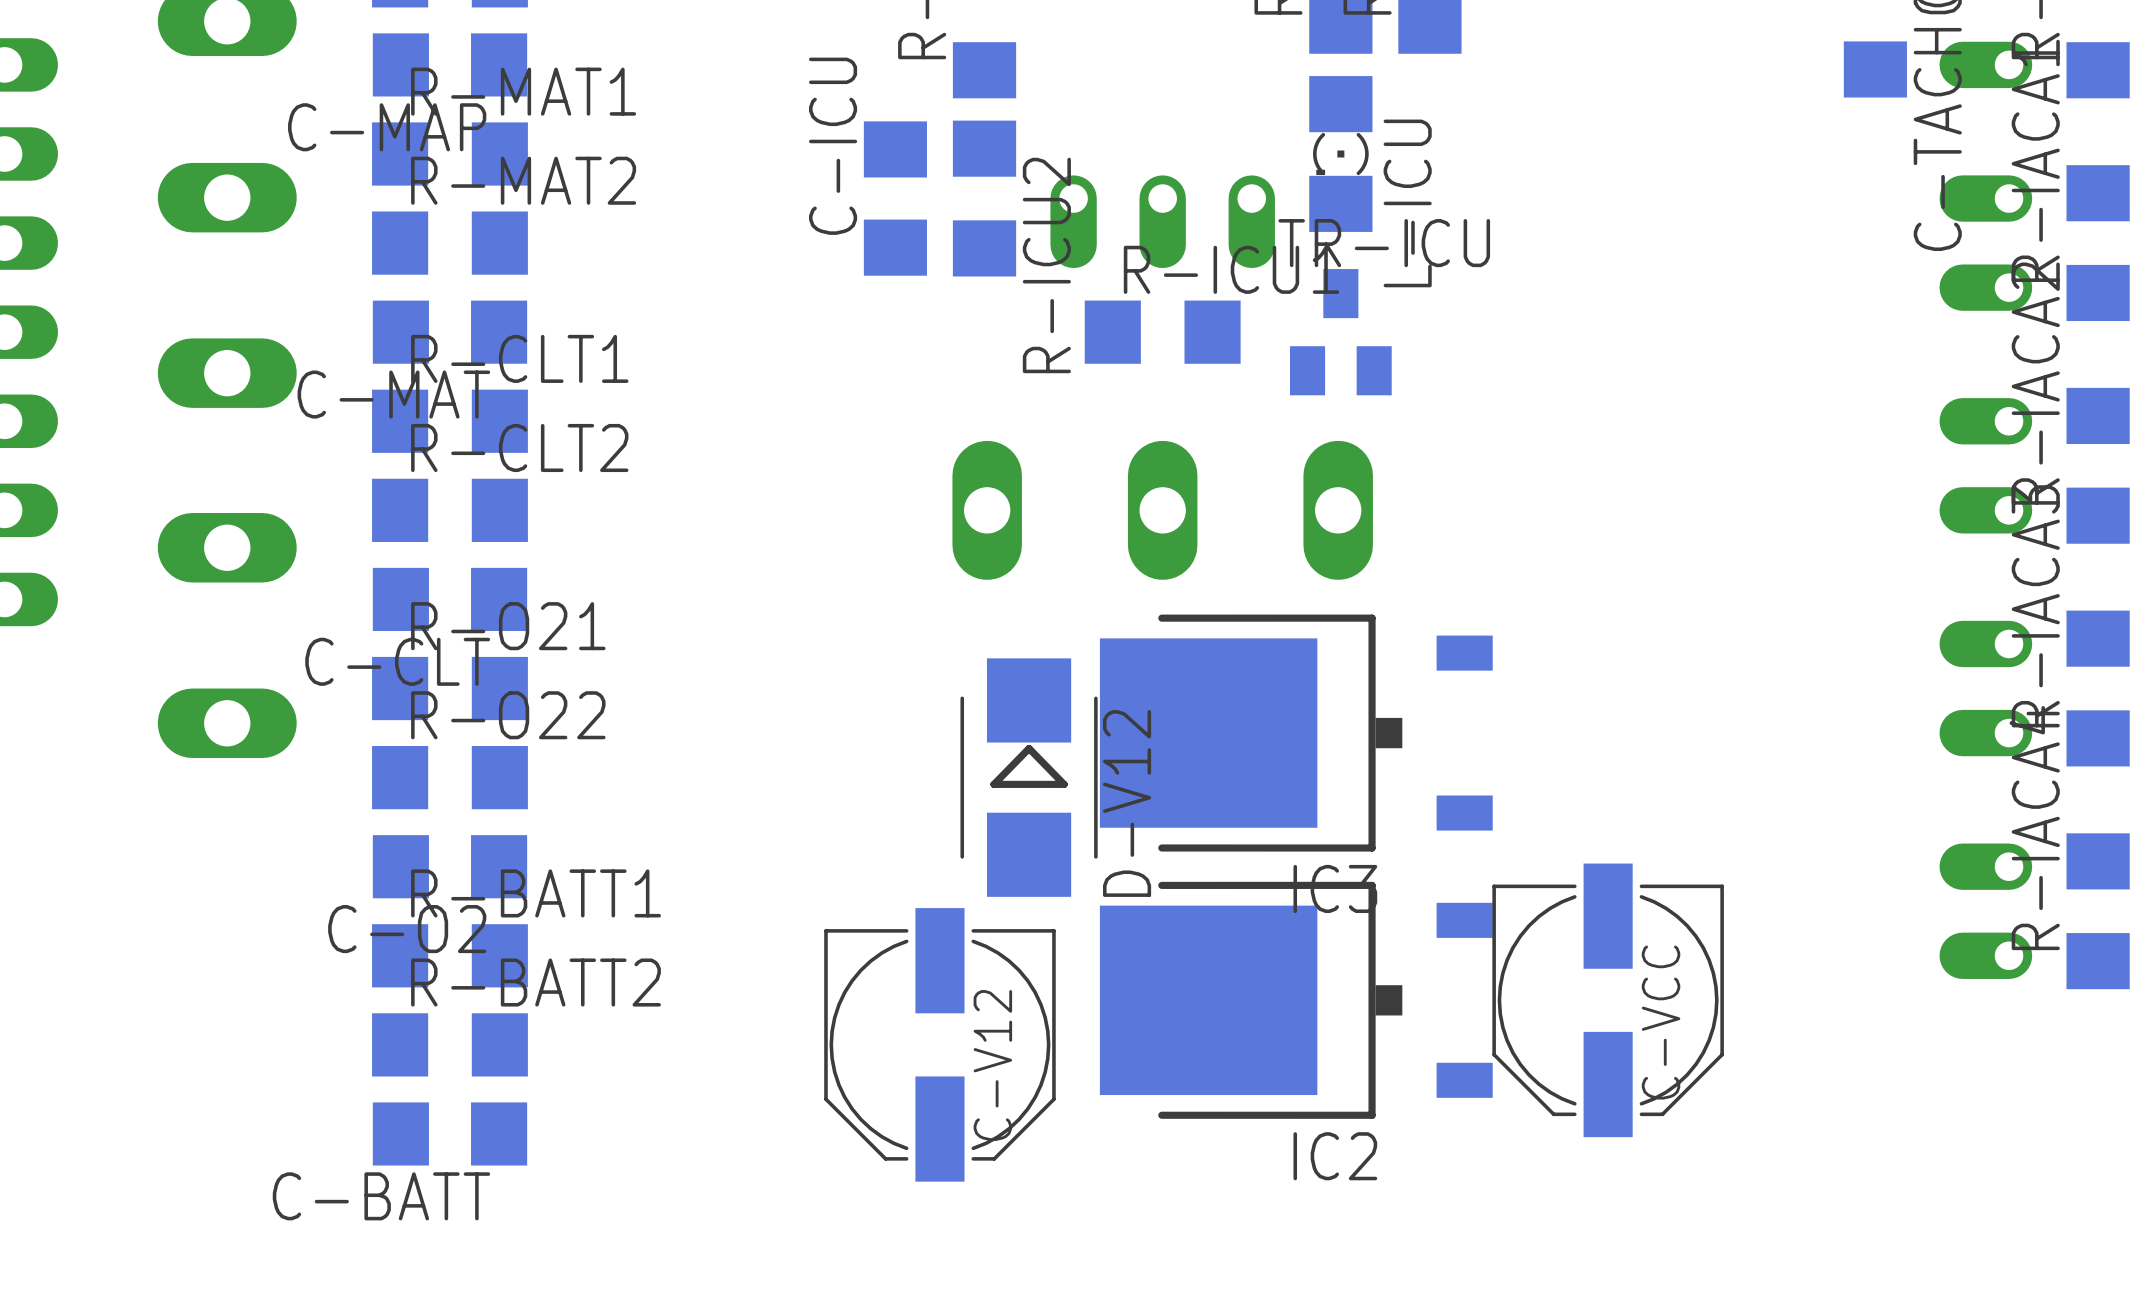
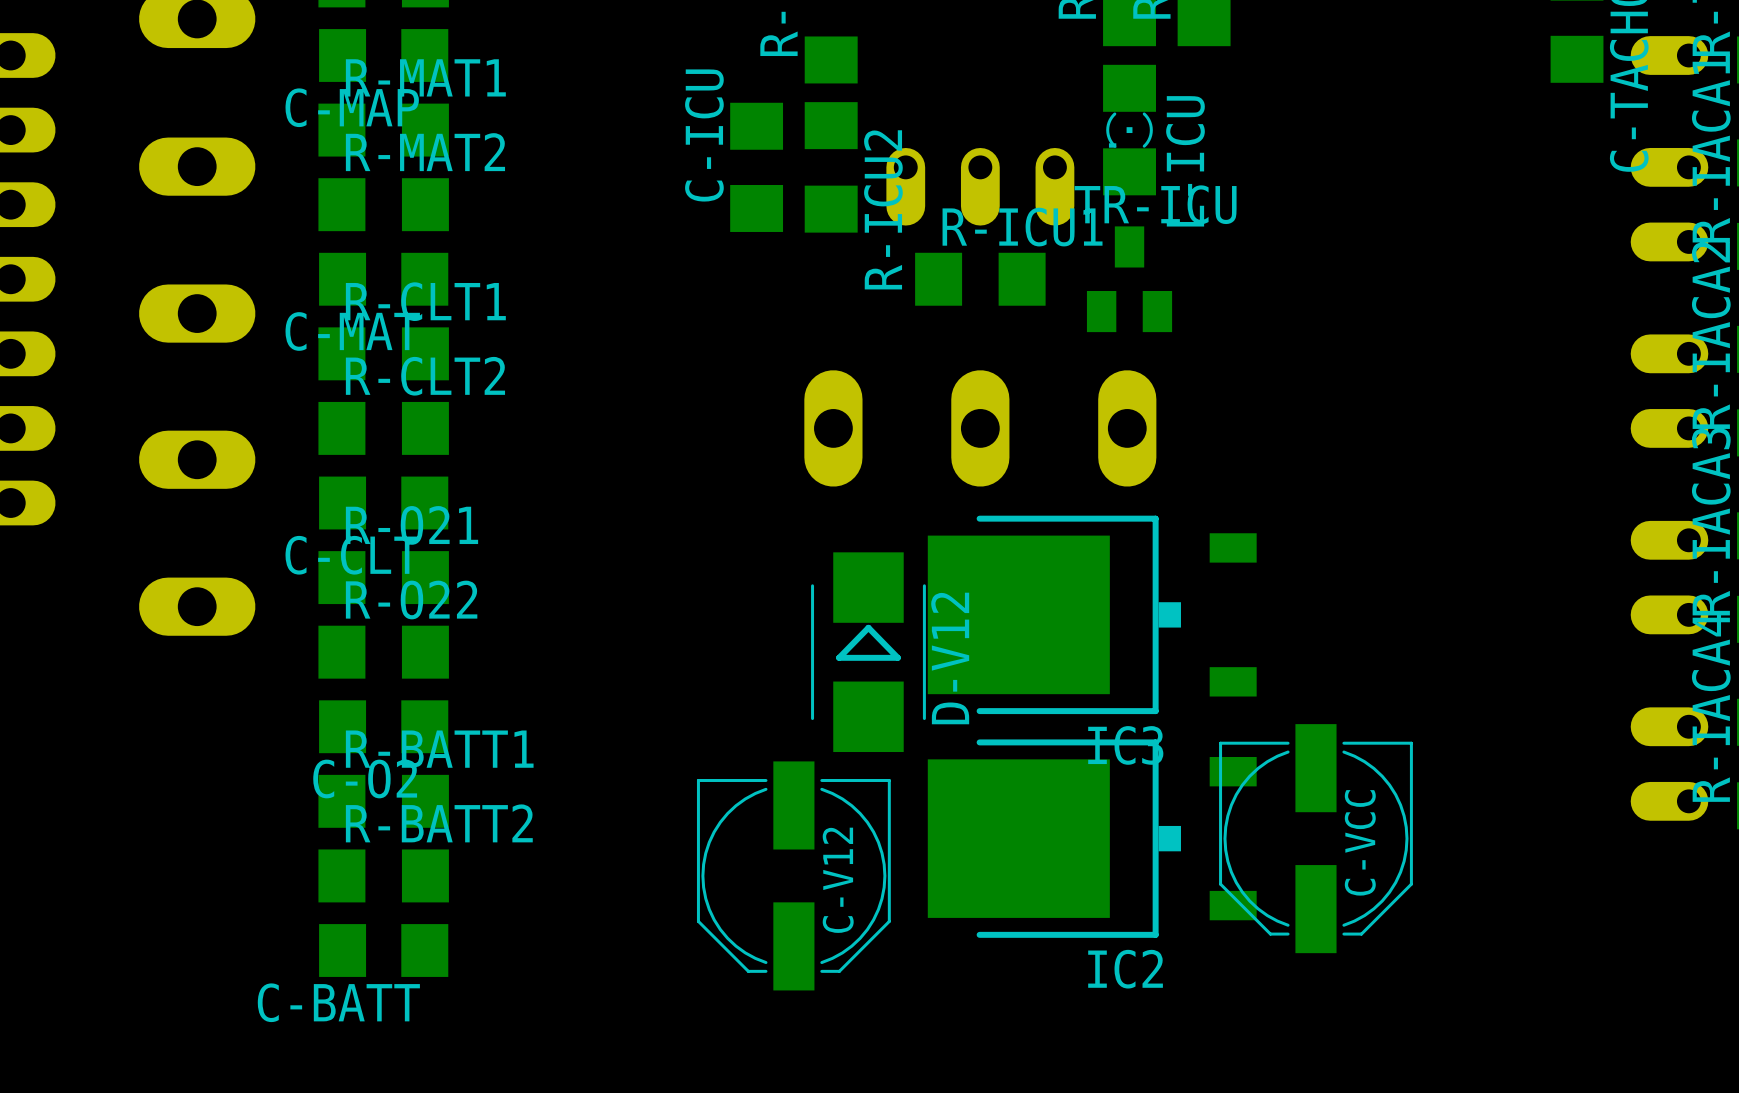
C-VCC position: (1608, 1000) -> (1315, 838)

